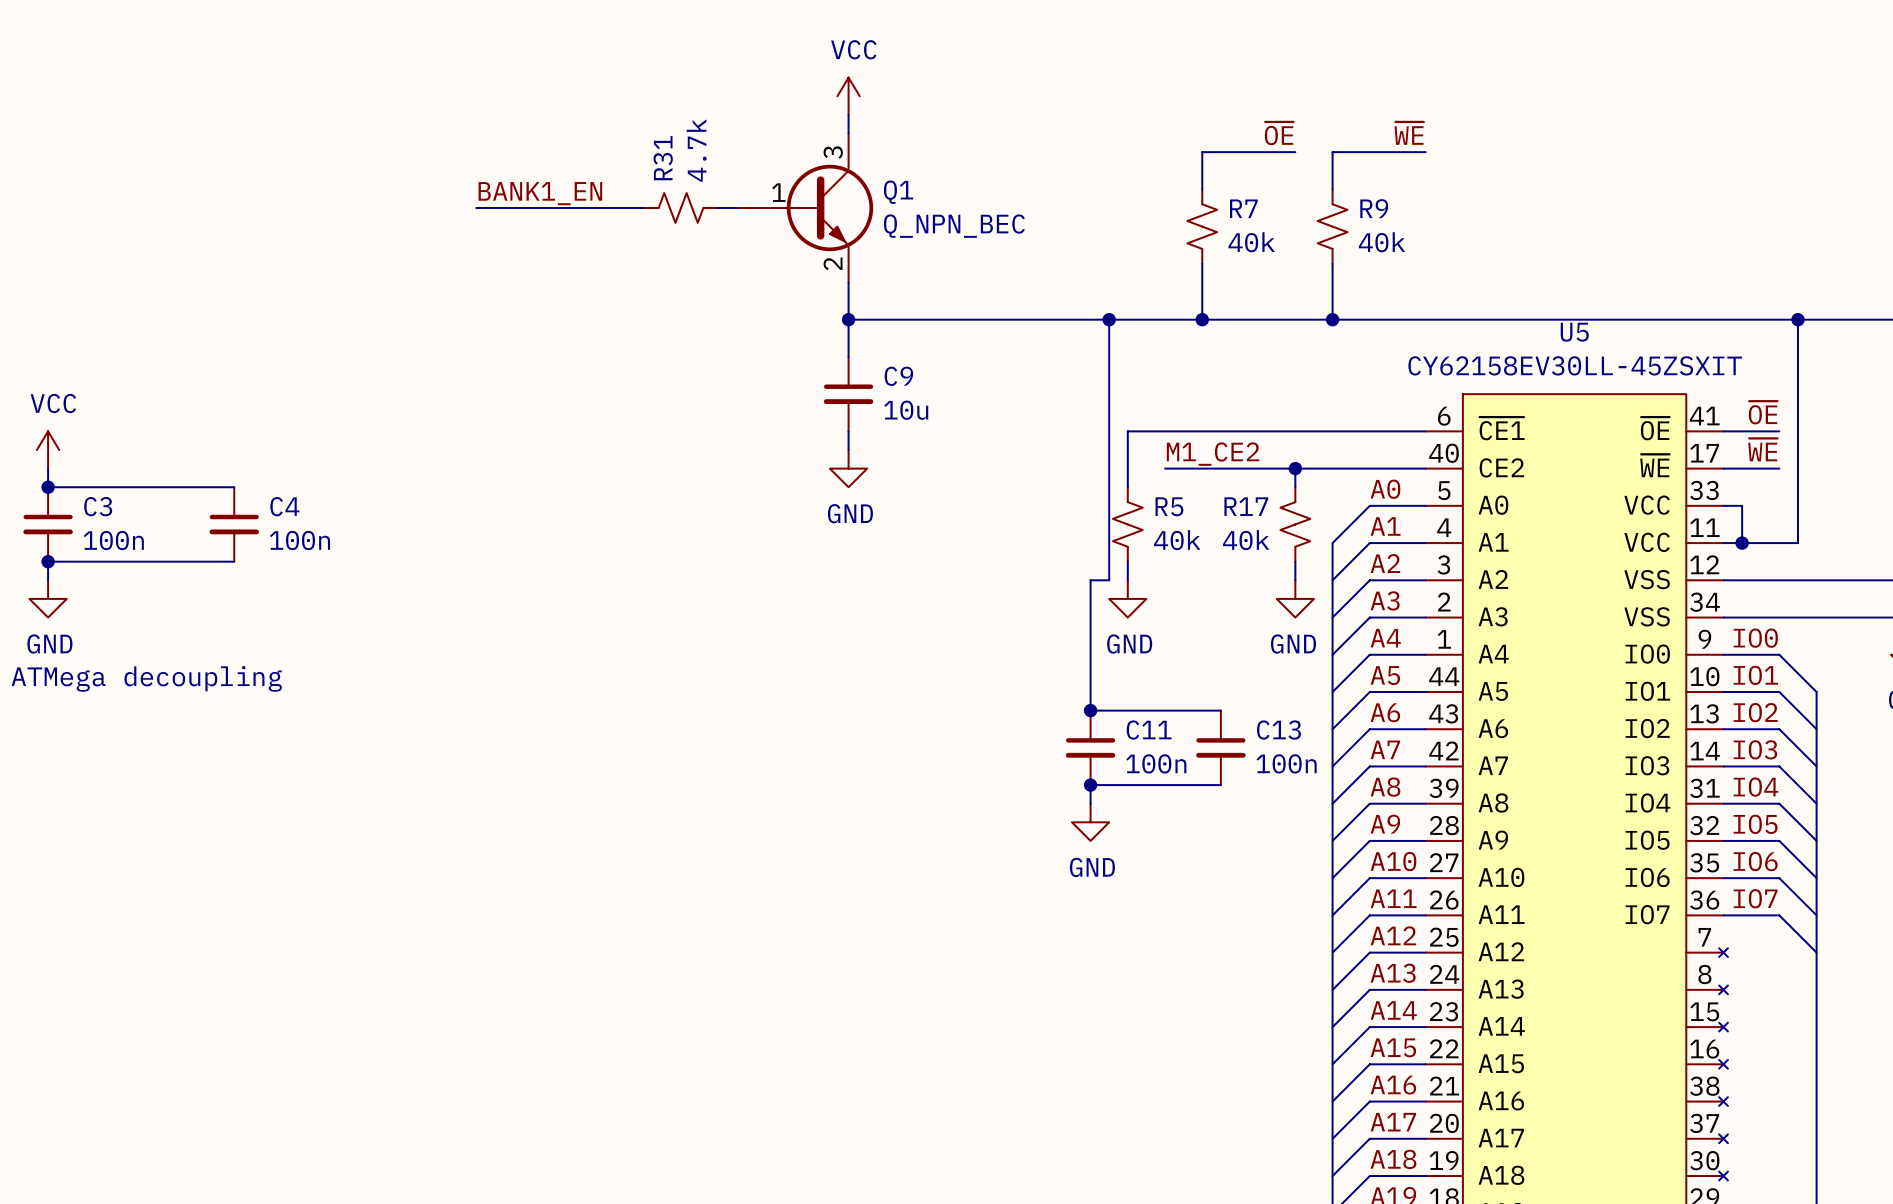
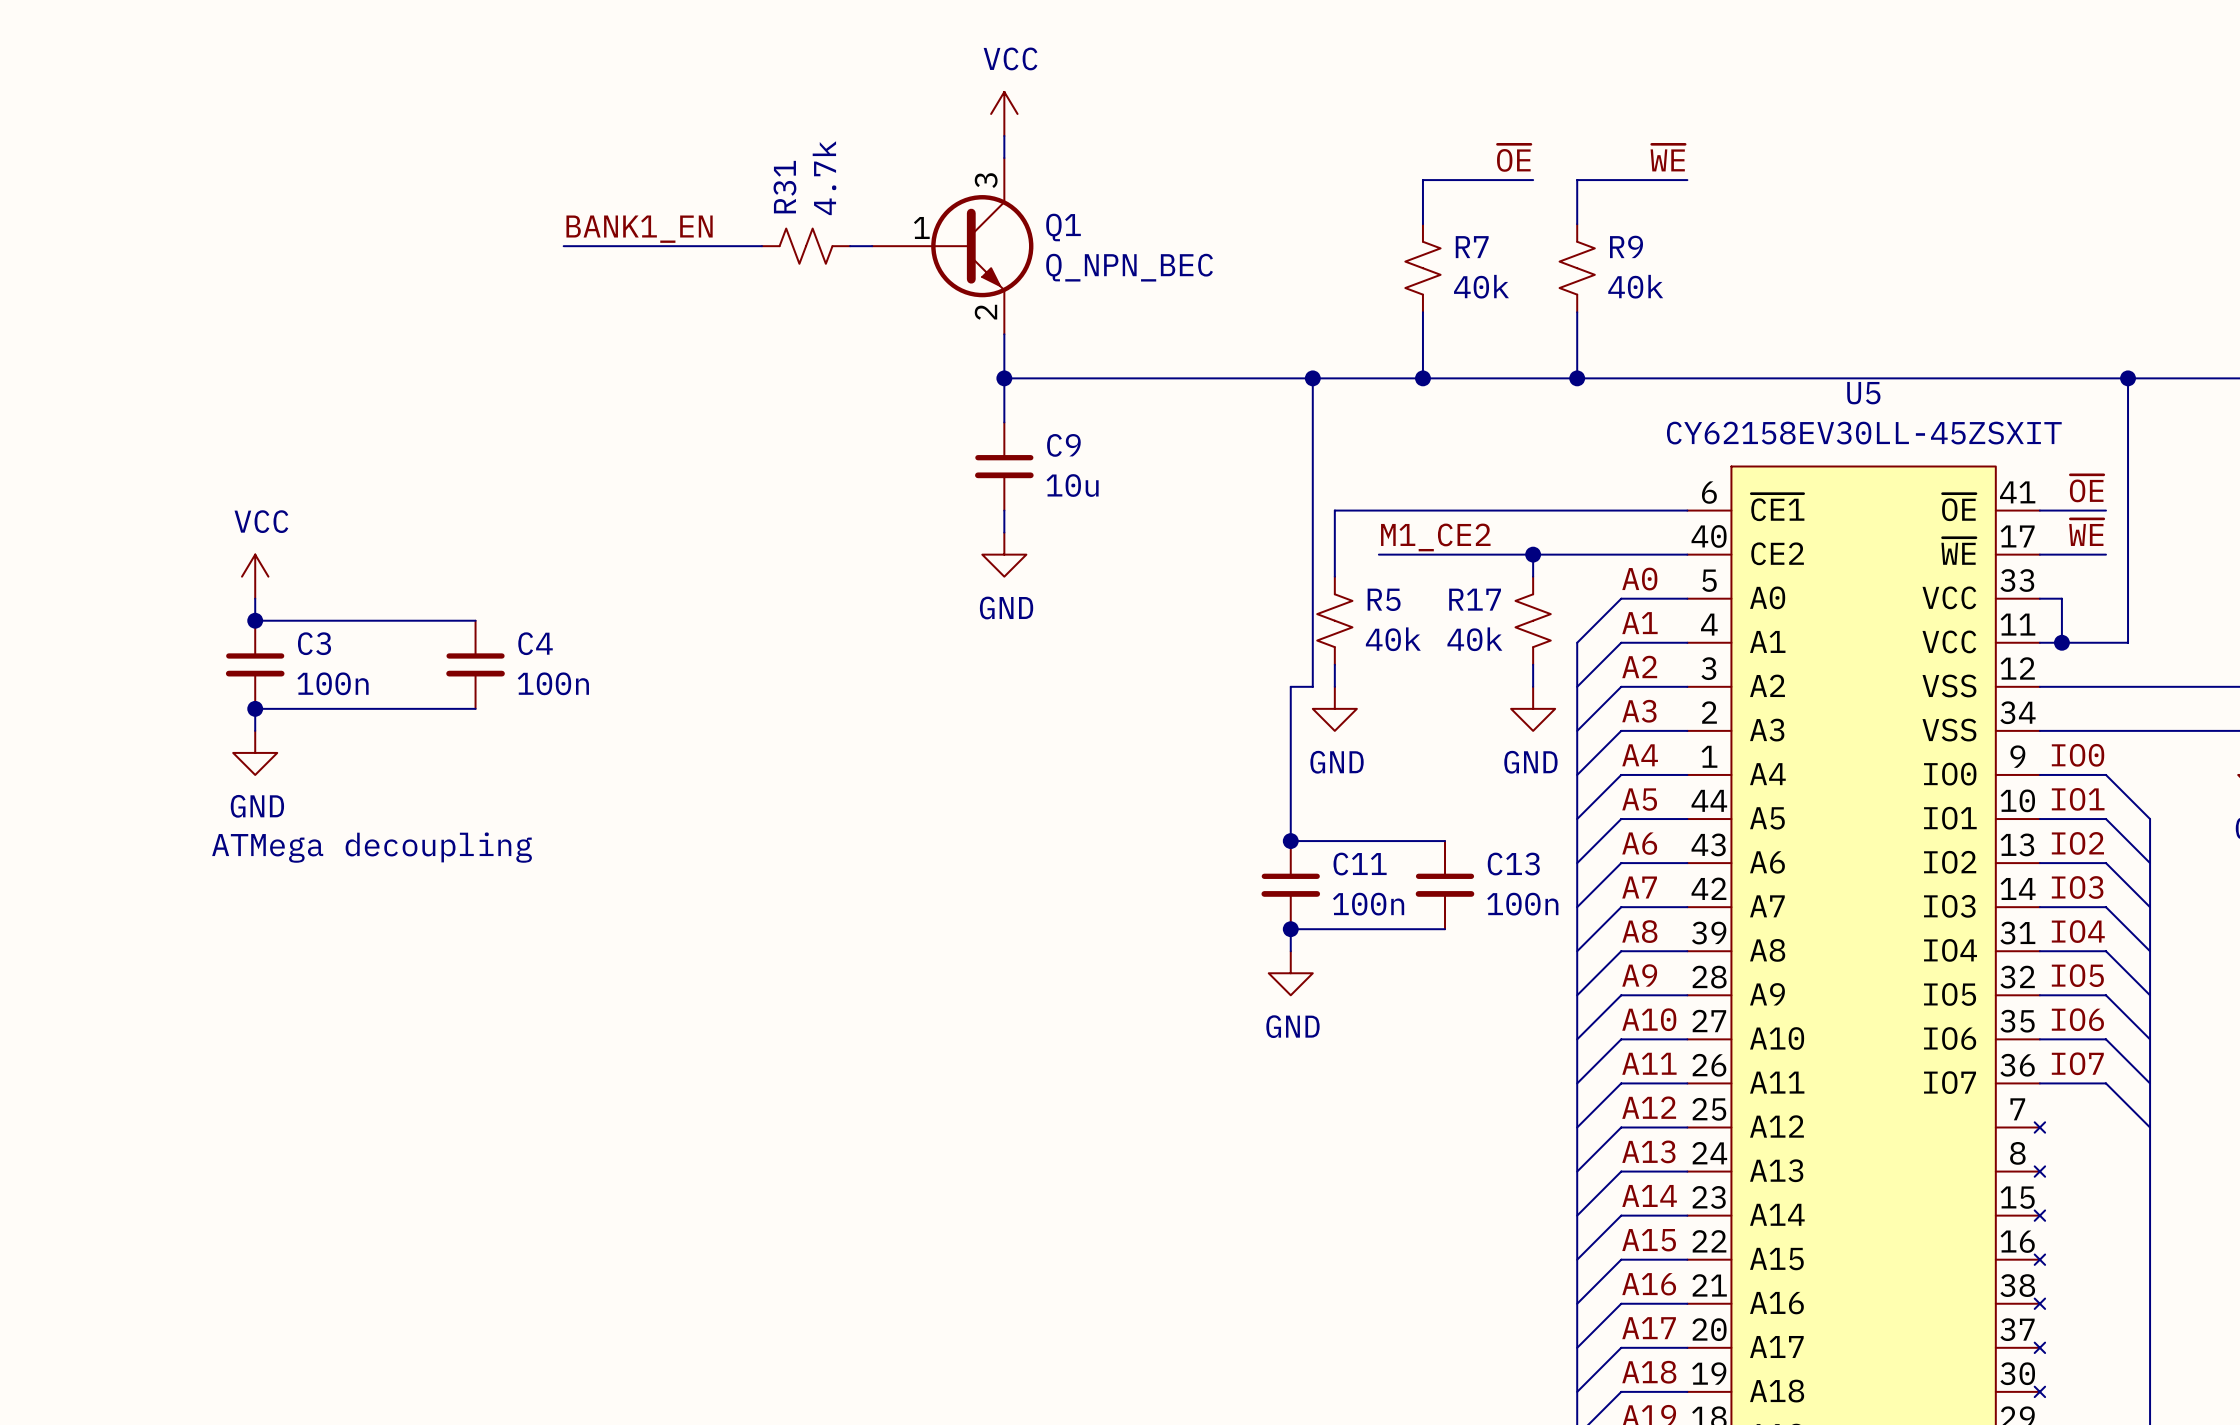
power symbol position: VCC (48, 449) -> VCC (255, 576)
wire: (48, 468) (48, 487) (234, 487) -> (255, 598) (255, 620) (475, 620)
junction: (48, 487) -> none
C3 position: (48, 524) -> (255, 664)
junction: none -> (255, 620)
C4 position: (234, 524) -> (475, 664)
junction: (48, 561) -> none
wire: (234, 561) (48, 561) (48, 580) -> (475, 708) (255, 708) (255, 730)
power symbol position: GND (48, 598) -> GND (255, 752)
junction: none -> (255, 708)
text position: ATMega decoupling (146, 678) -> ATMega decoupling (372, 847)

